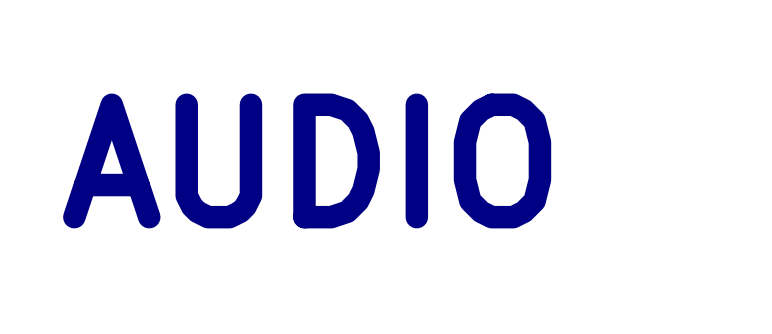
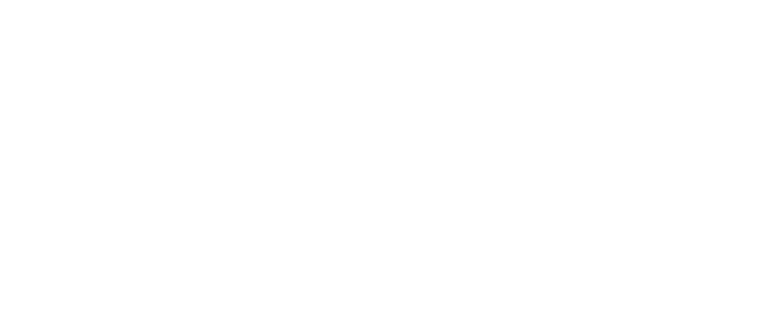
text: AUDIO (307, 160) -> none

